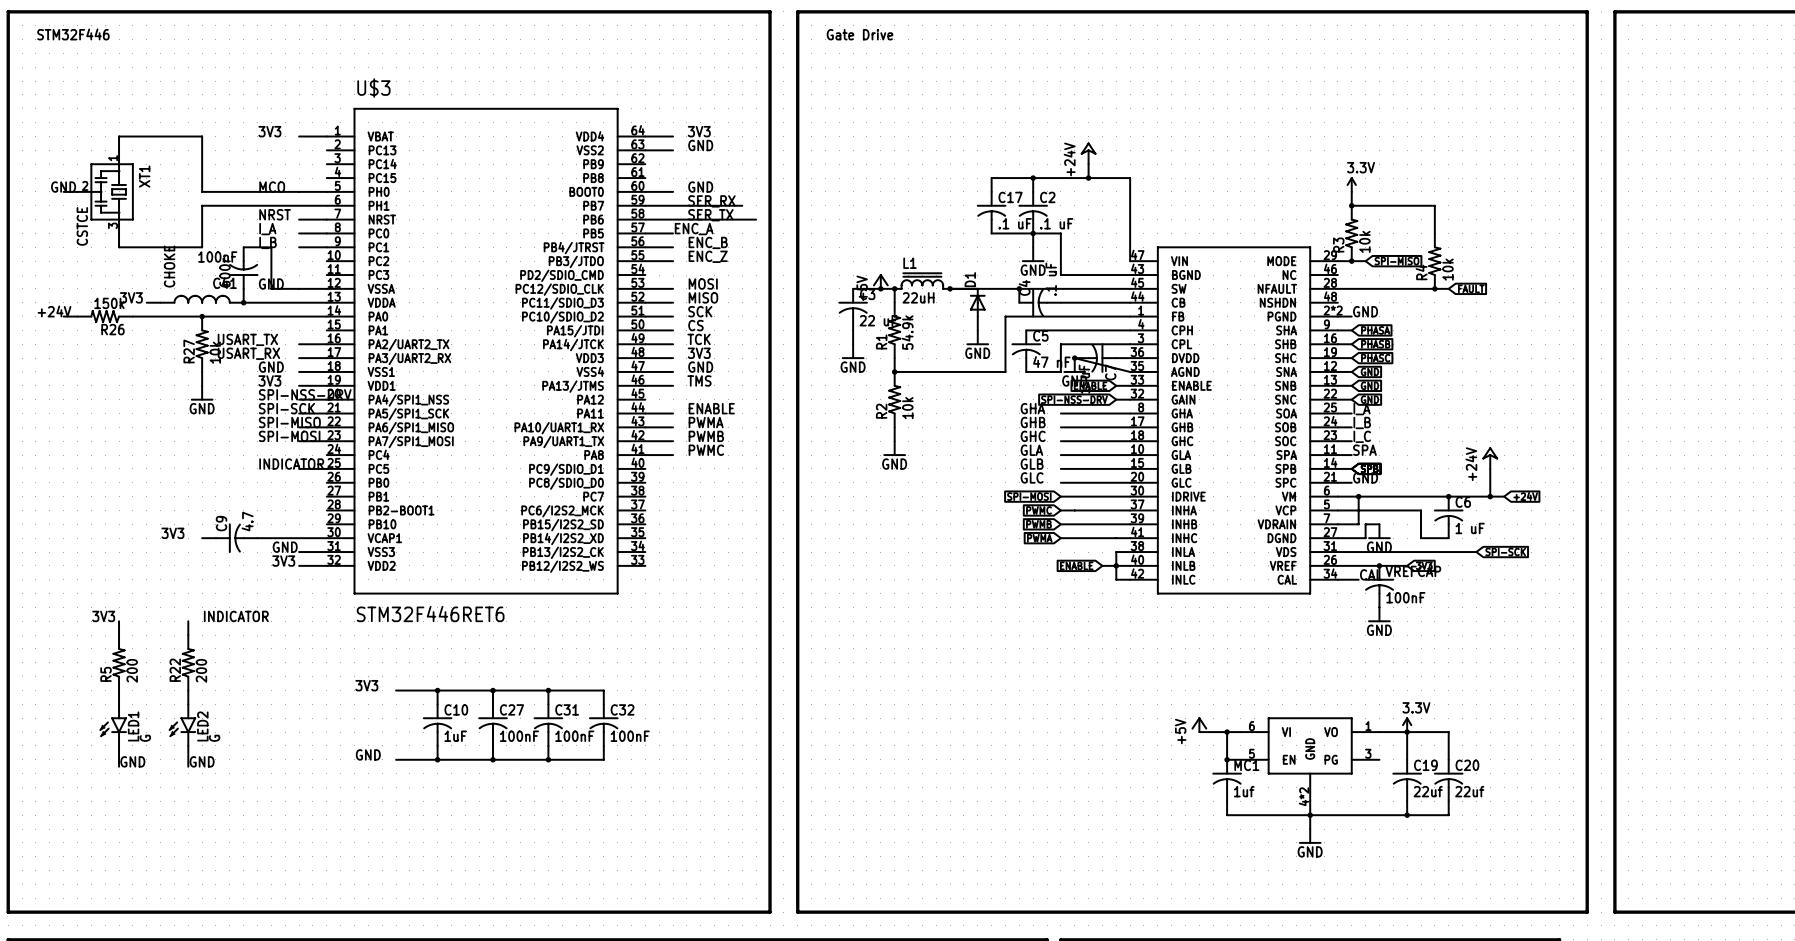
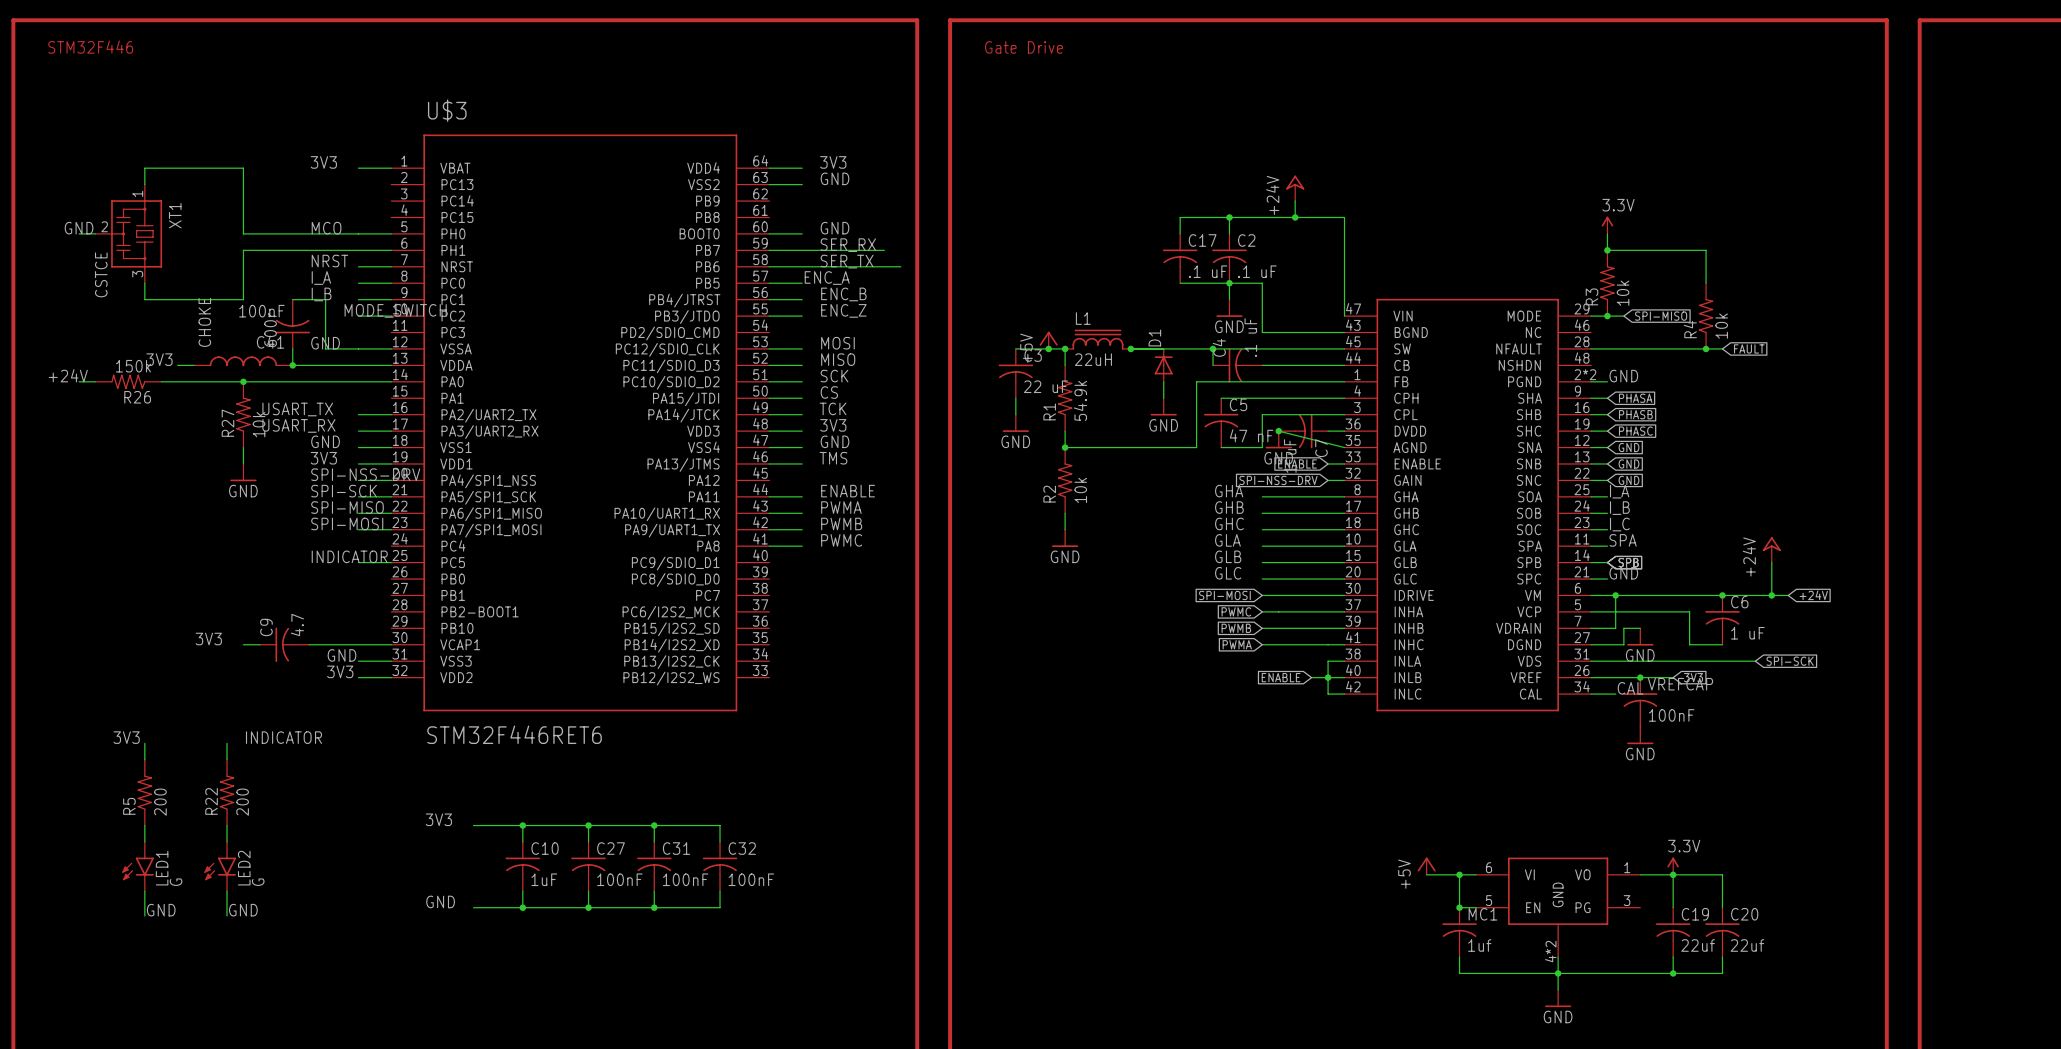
label: none -> MODE_SWITCH (395, 310)
wire: none -> (358, 316) (391, 316)

